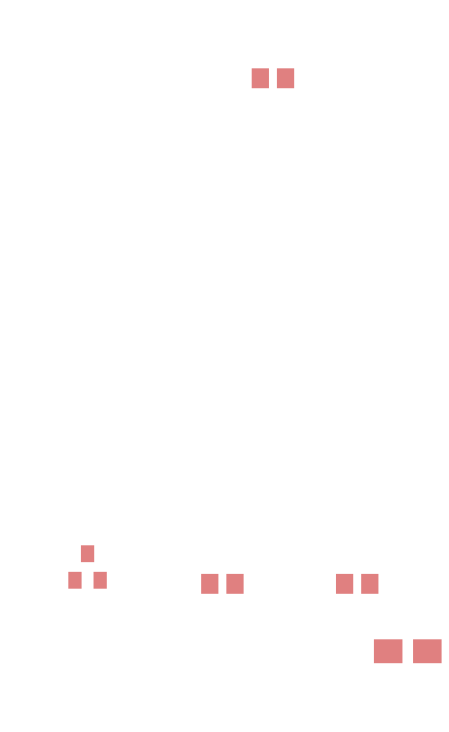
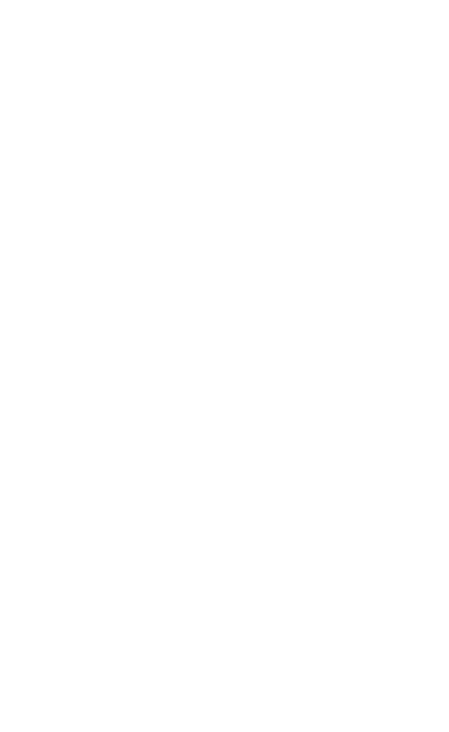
part: (272, 78) -> none
part: (87, 566) -> none
part: (222, 583) -> none
part: (357, 583) -> none
part: (407, 651) -> none

